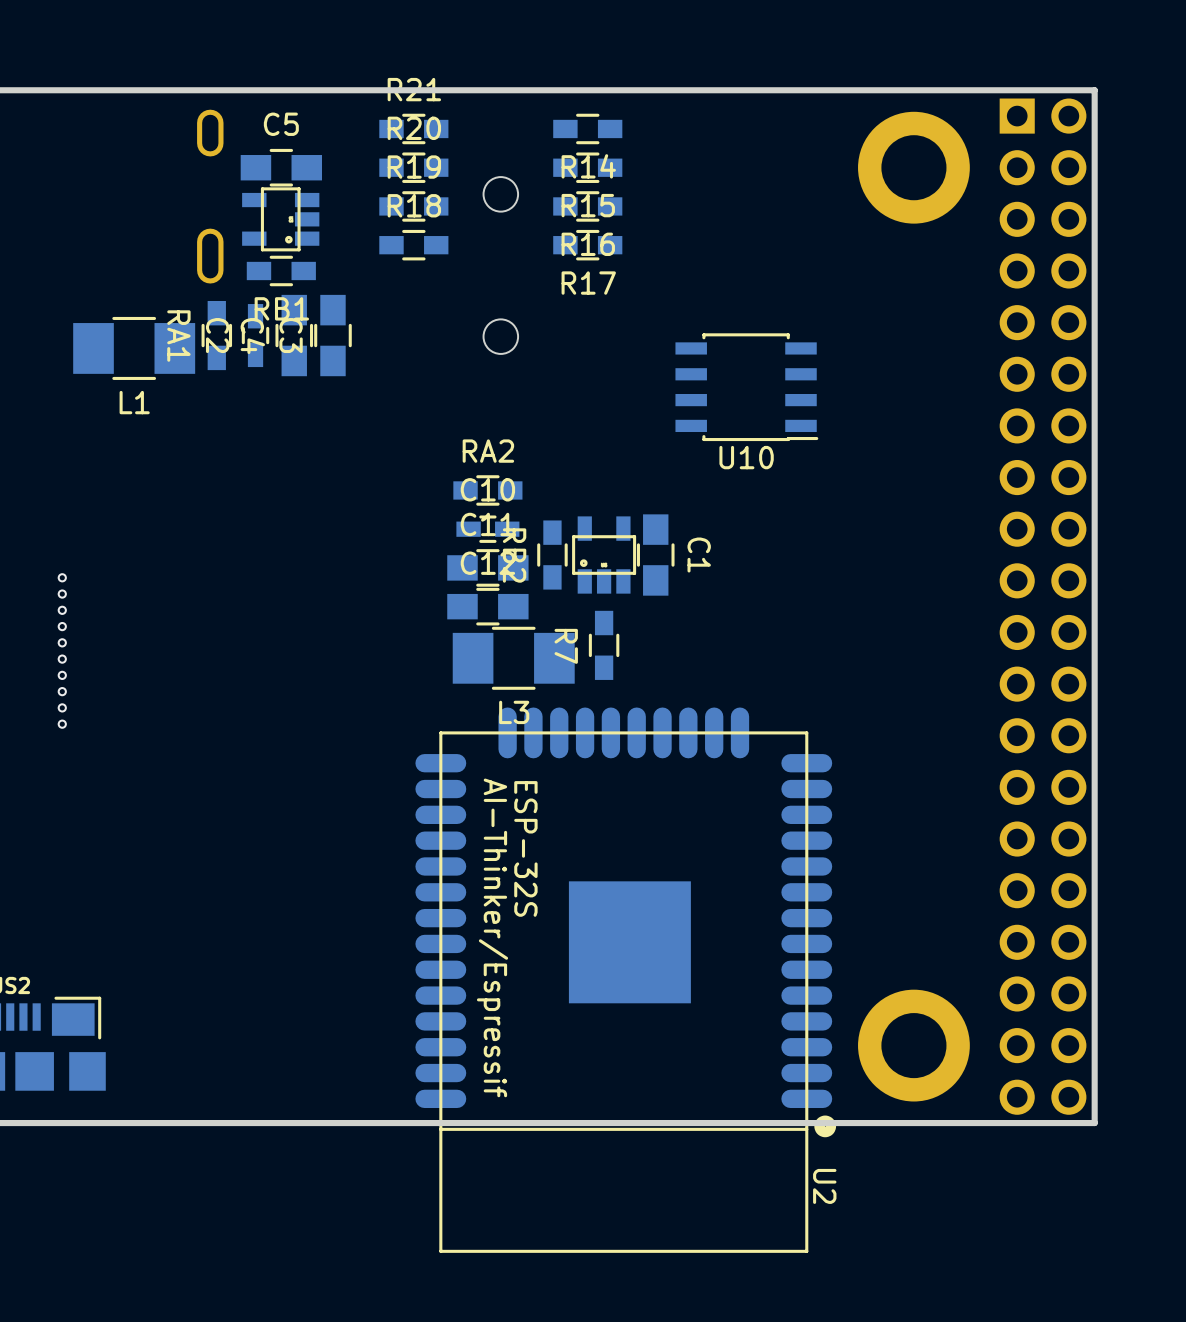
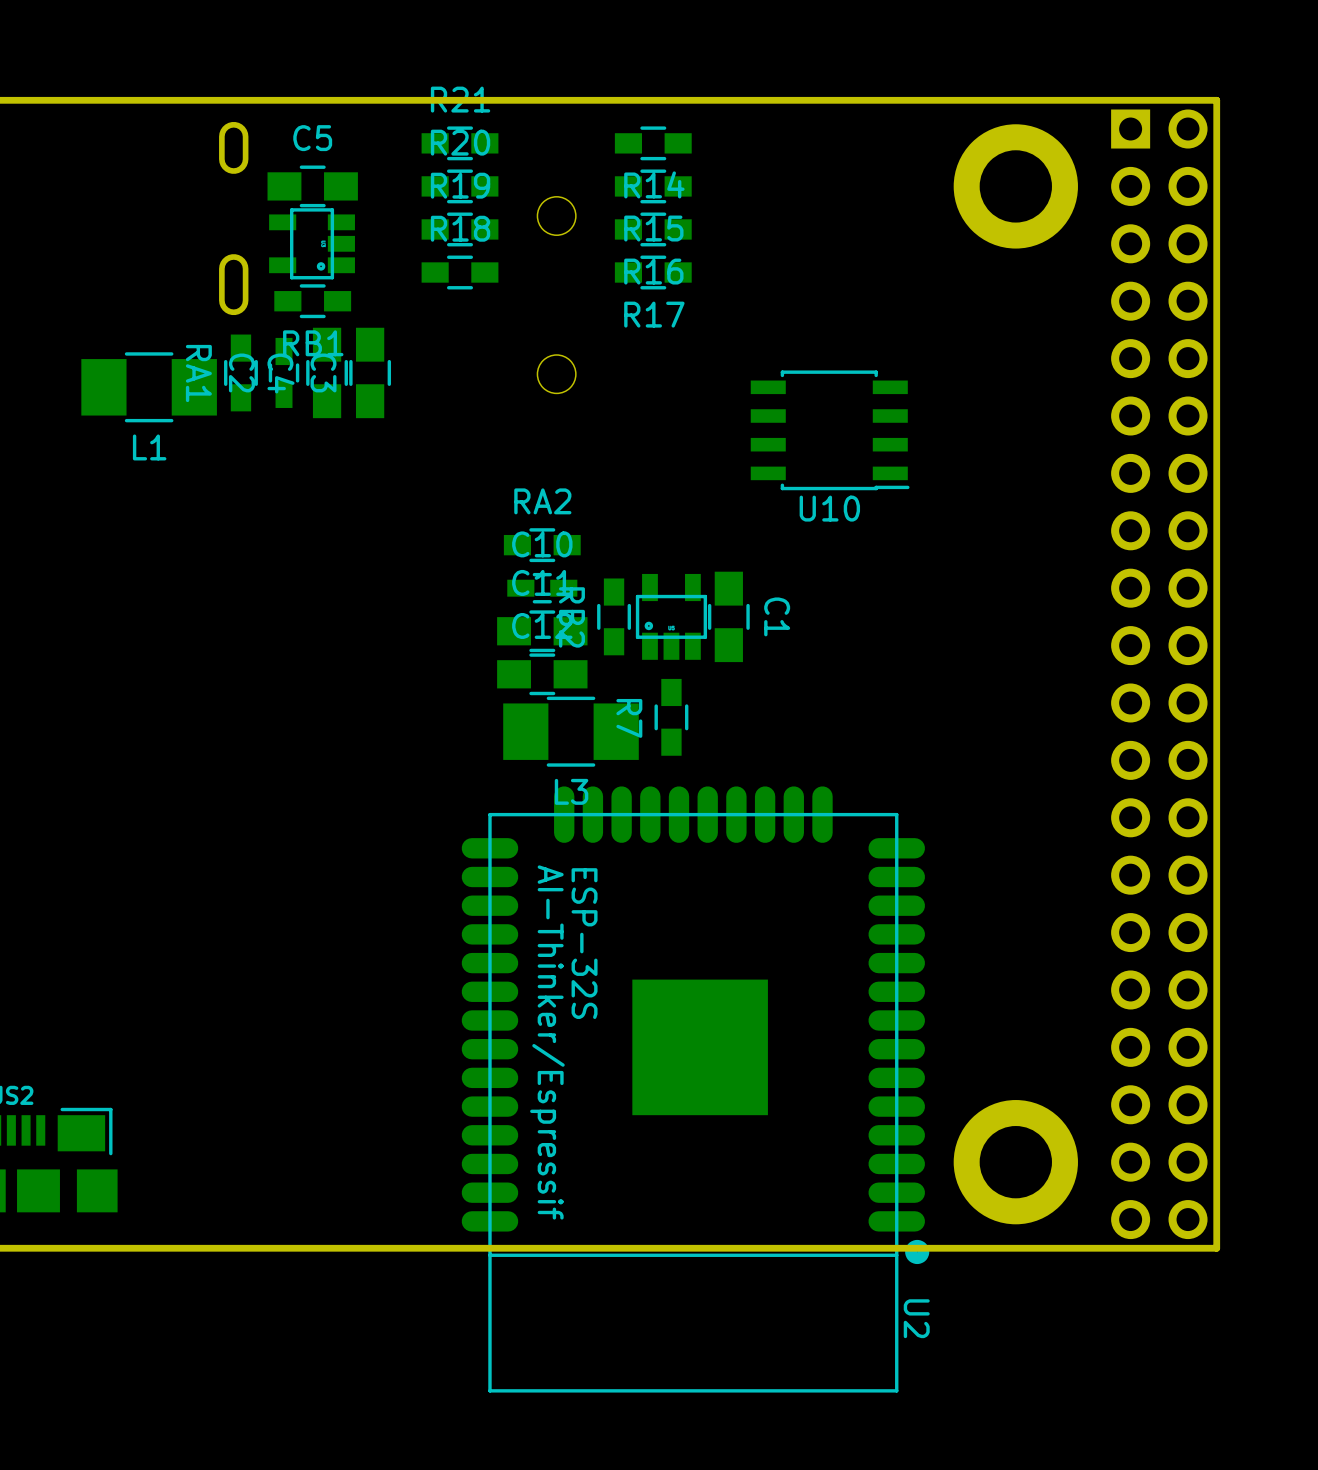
via: (62, 577) -> none
via: (62, 594) -> none
via: (62, 610) -> none
via: (62, 626) -> none
via: (62, 642) -> none
via: (62, 659) -> none
via: (62, 675) -> none
via: (62, 691) -> none
via: (62, 707) -> none
via: (62, 724) -> none

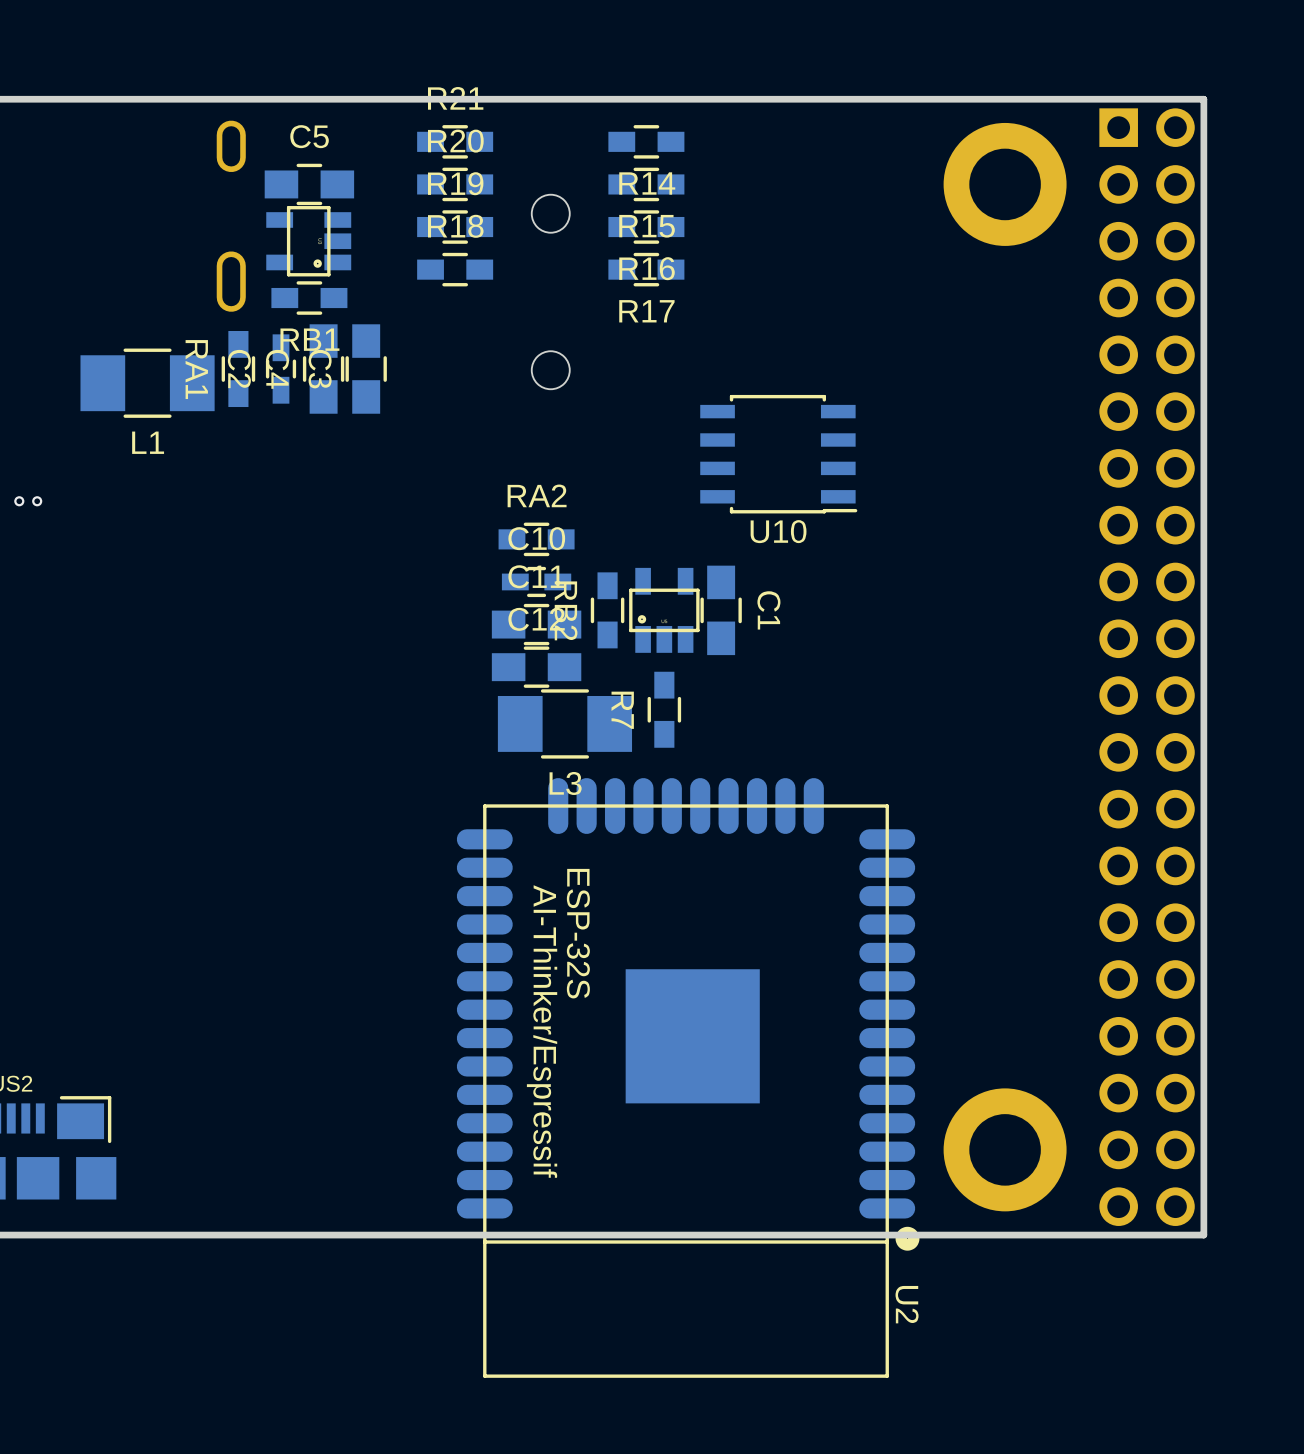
U10 position: (830, 430) -> (778, 454)
via: none -> (19, 501)
via: none -> (37, 501)

